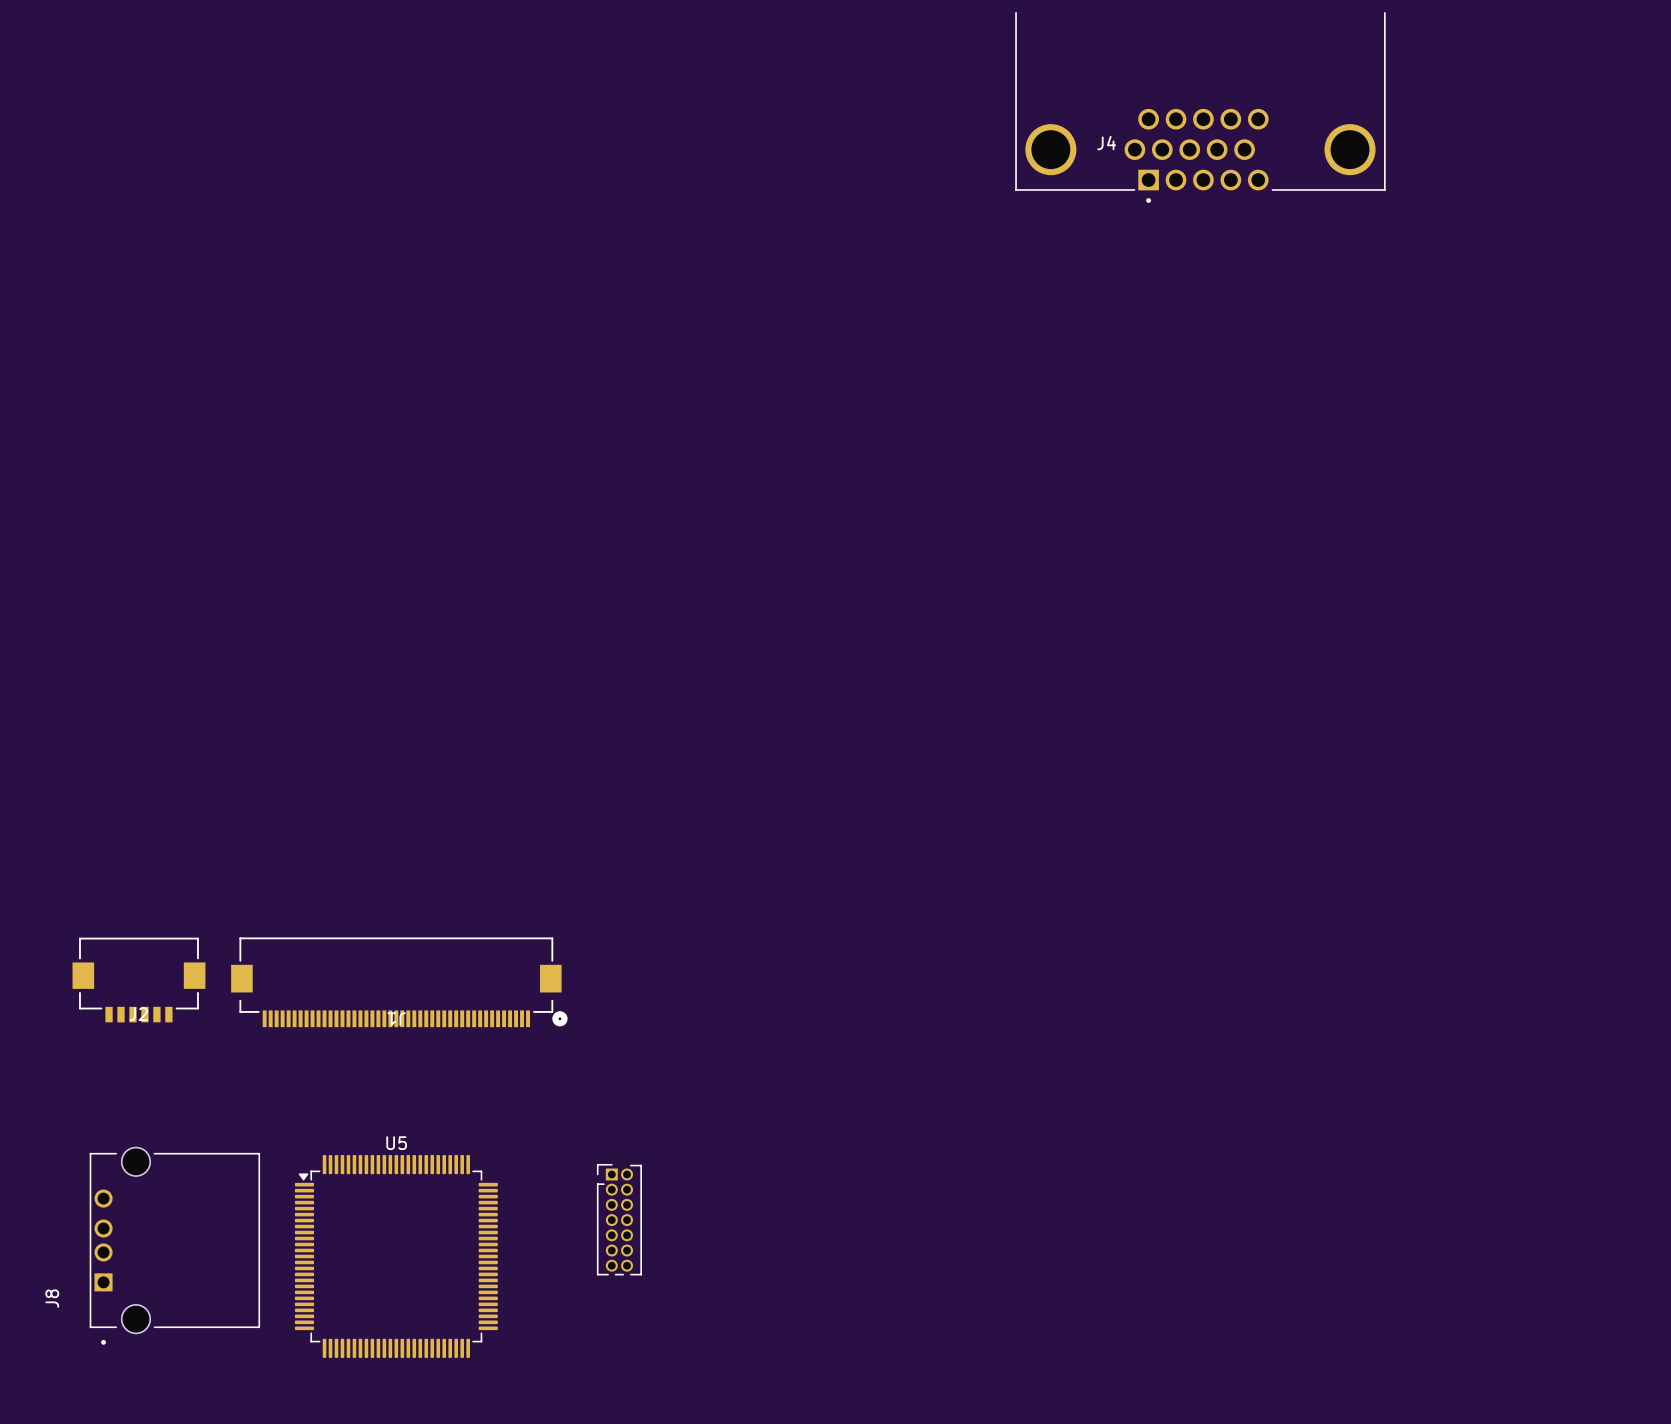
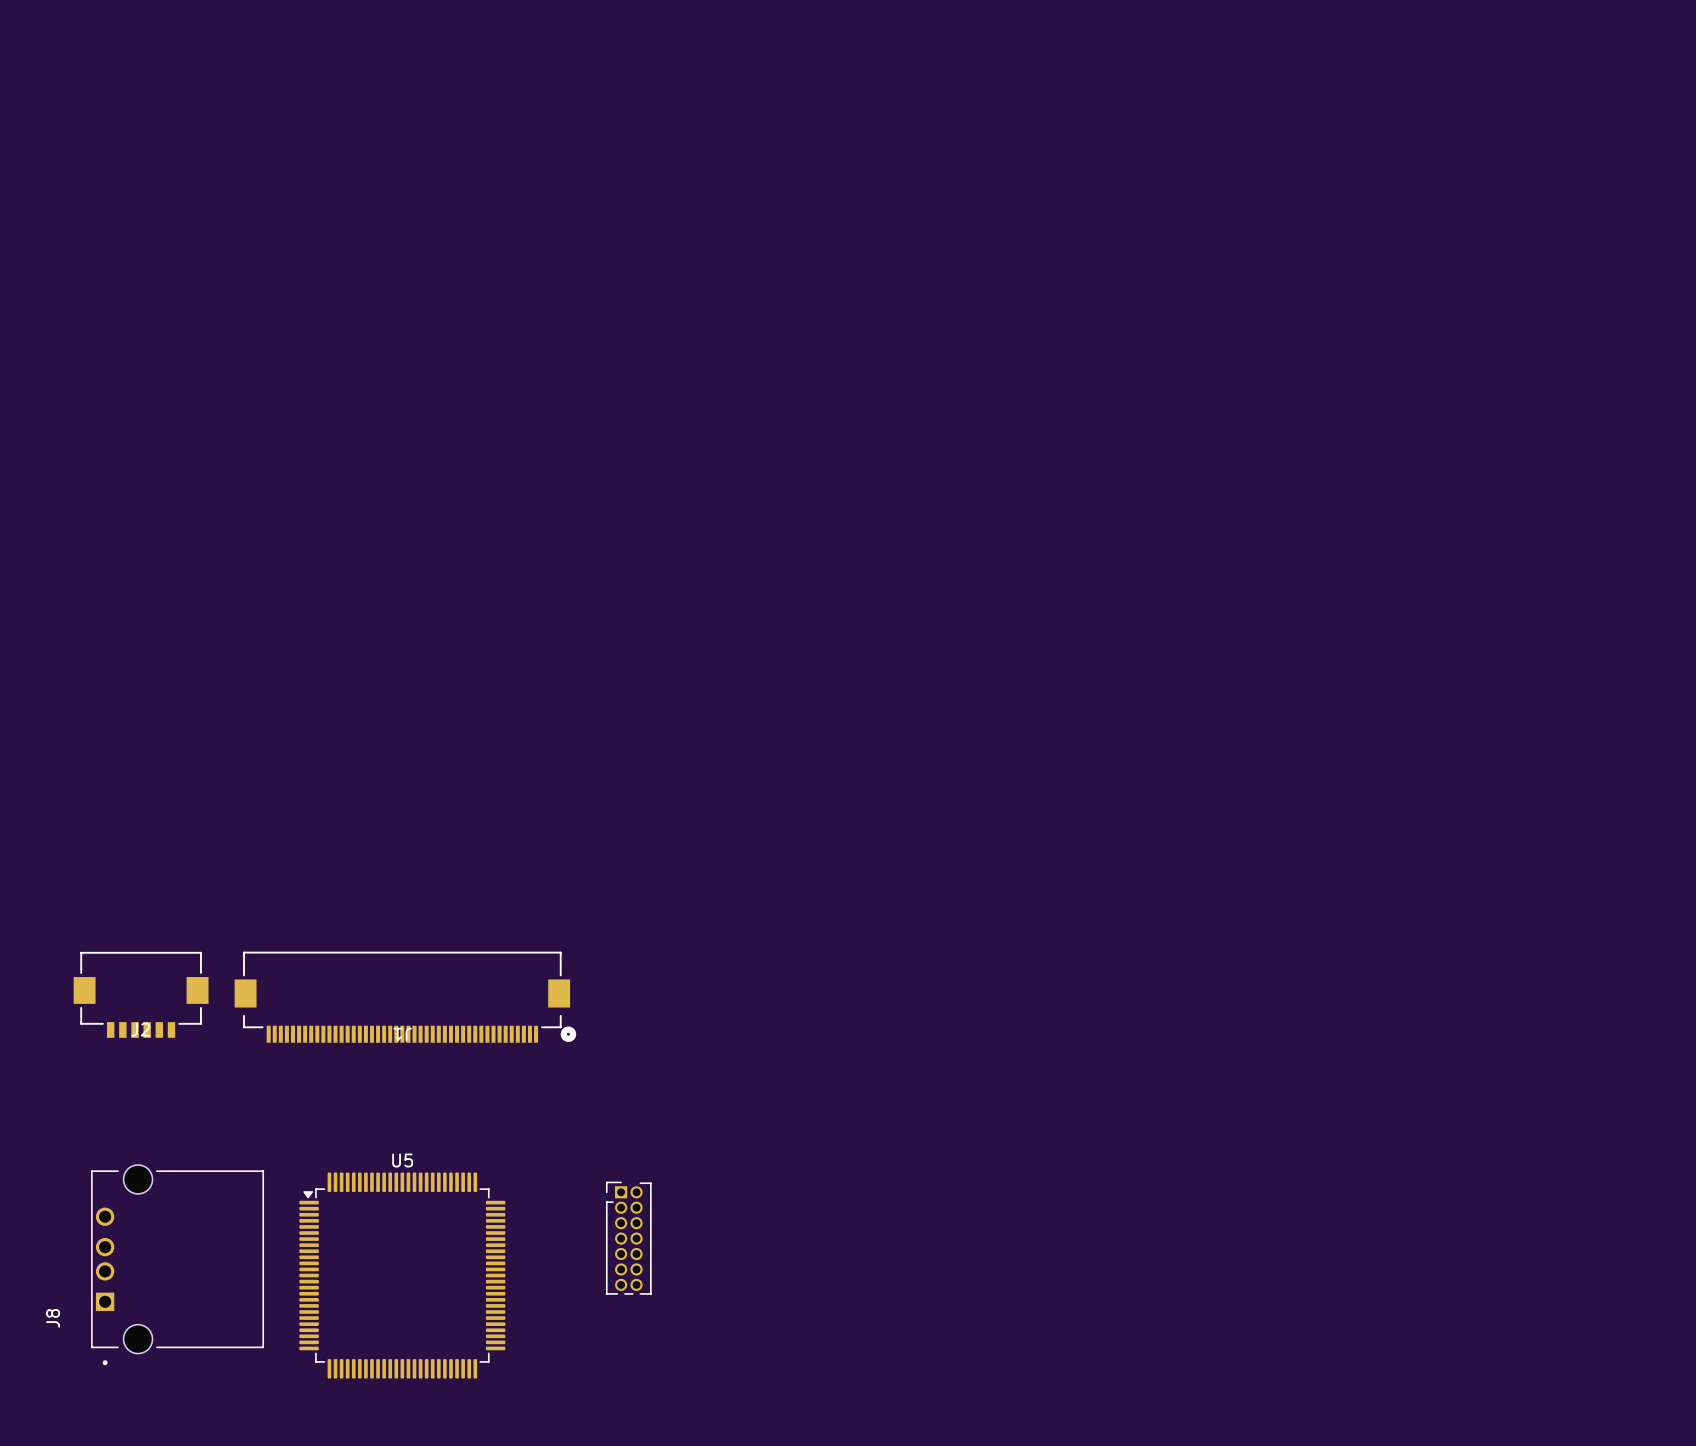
J4: (1200, 107) -> none

